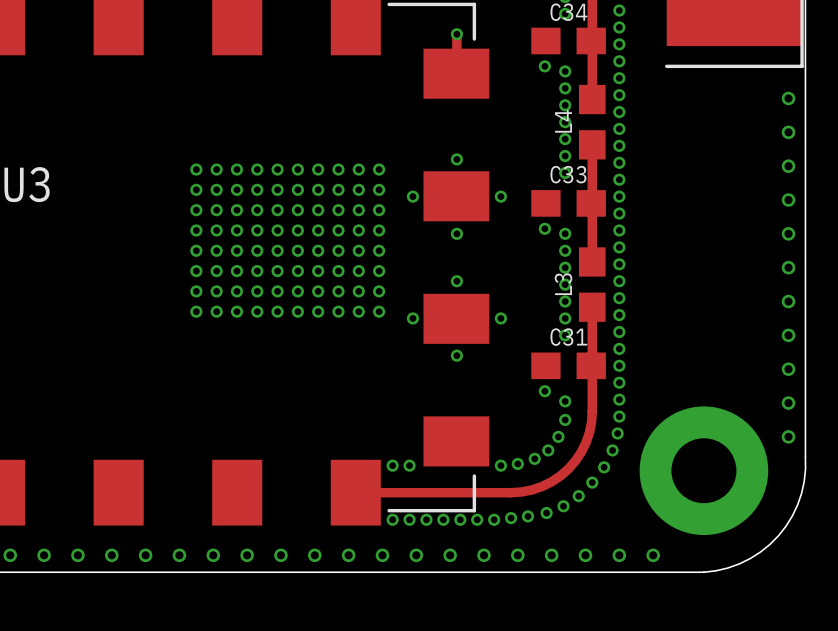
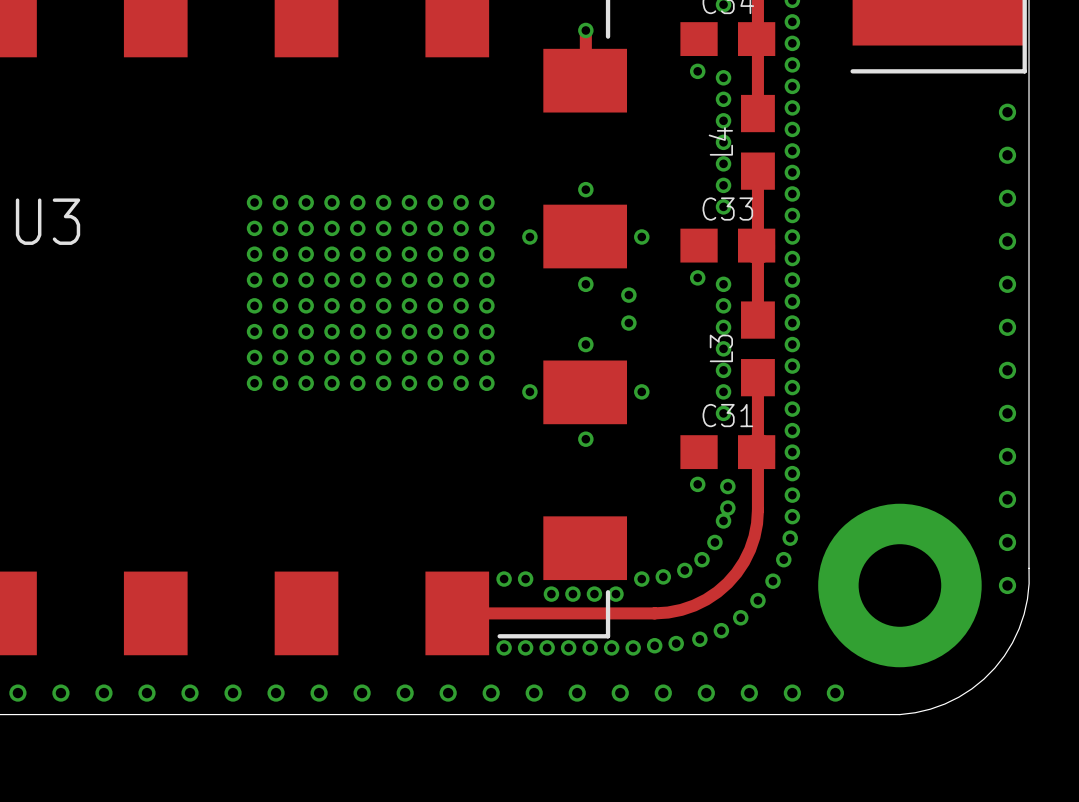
via: none -> (628, 295)
via: none -> (628, 323)
via: none -> (727, 486)
via: (565, 401) -> none
via: none -> (727, 508)
via: none -> (1007, 585)
via: none -> (551, 594)
via: none -> (572, 594)
via: none -> (594, 594)
via: none -> (615, 594)

